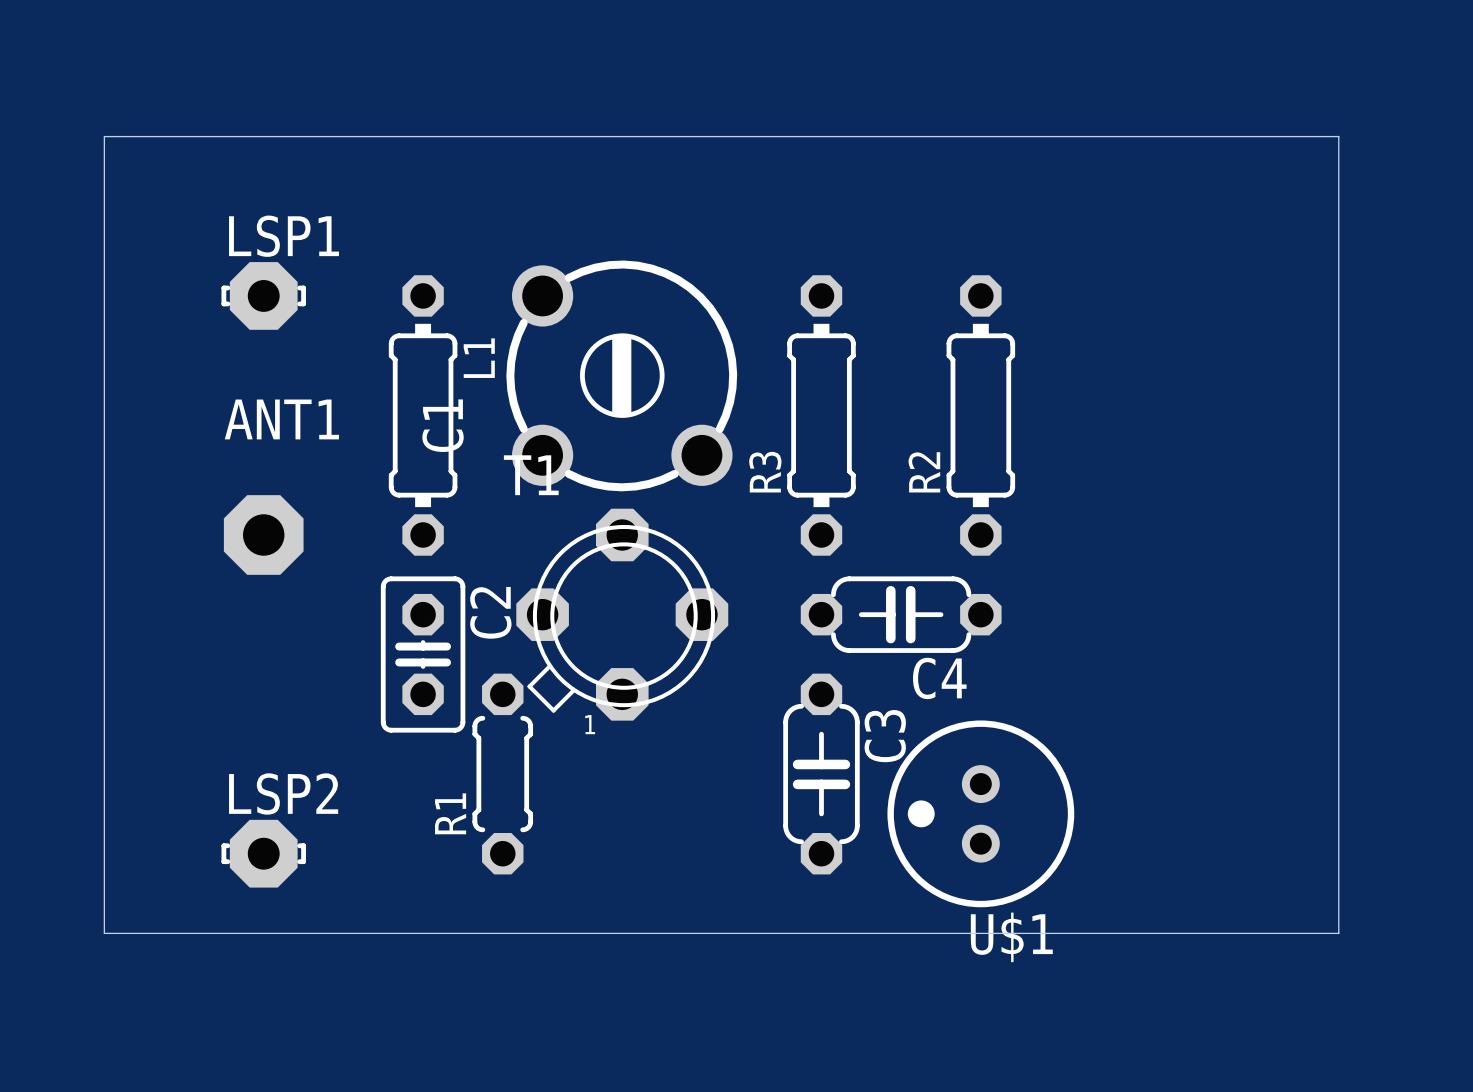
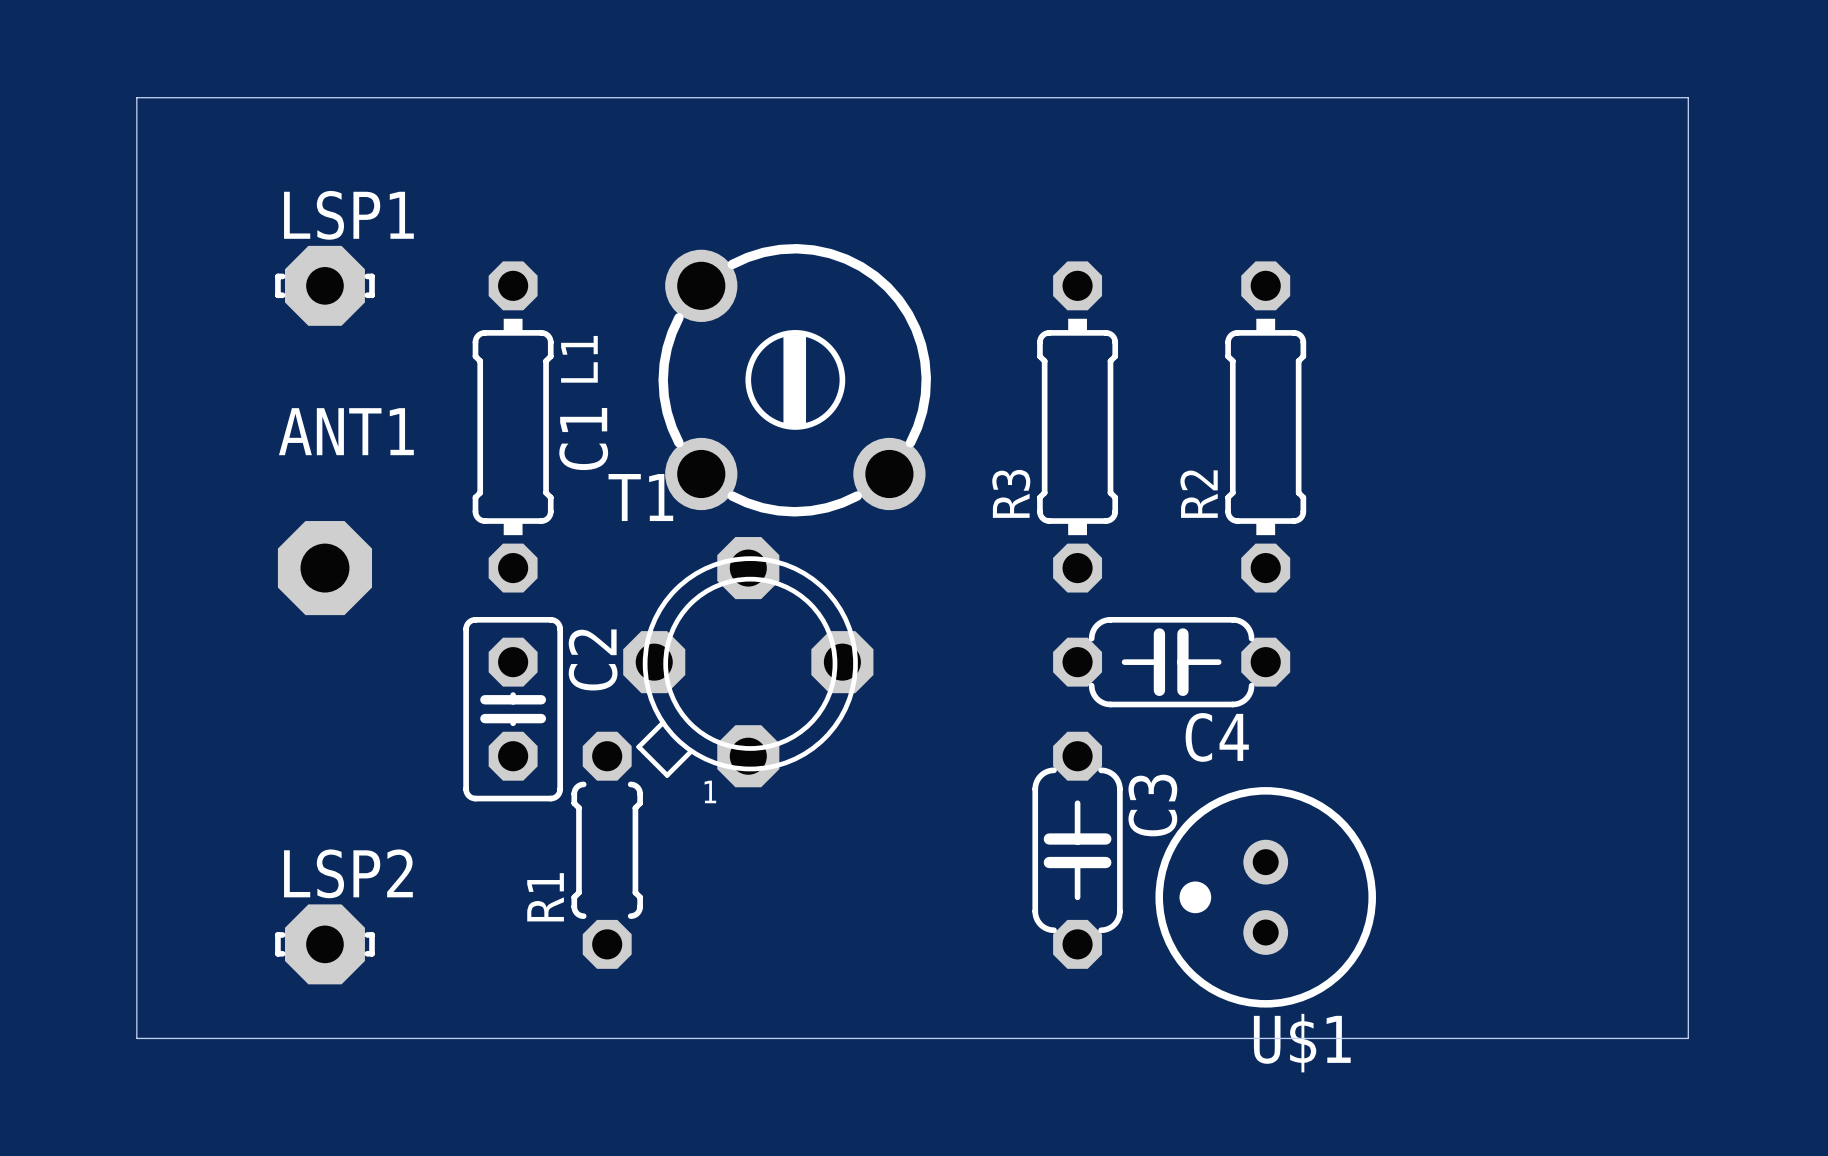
board edge: (1338, 136) (1338, 933) -> (1594, 97) (1688, 97) (1688, 1038) (1594, 1038)
C1 position: (621, 375) -> (794, 380)
R3 position: (821, 415) -> (1077, 426)
R2 position: (980, 415) -> (1265, 426)
C4 position: (901, 614) -> (1171, 662)
C3 position: (821, 774) -> (1077, 850)
U$1 position: (980, 813) -> (1265, 897)

